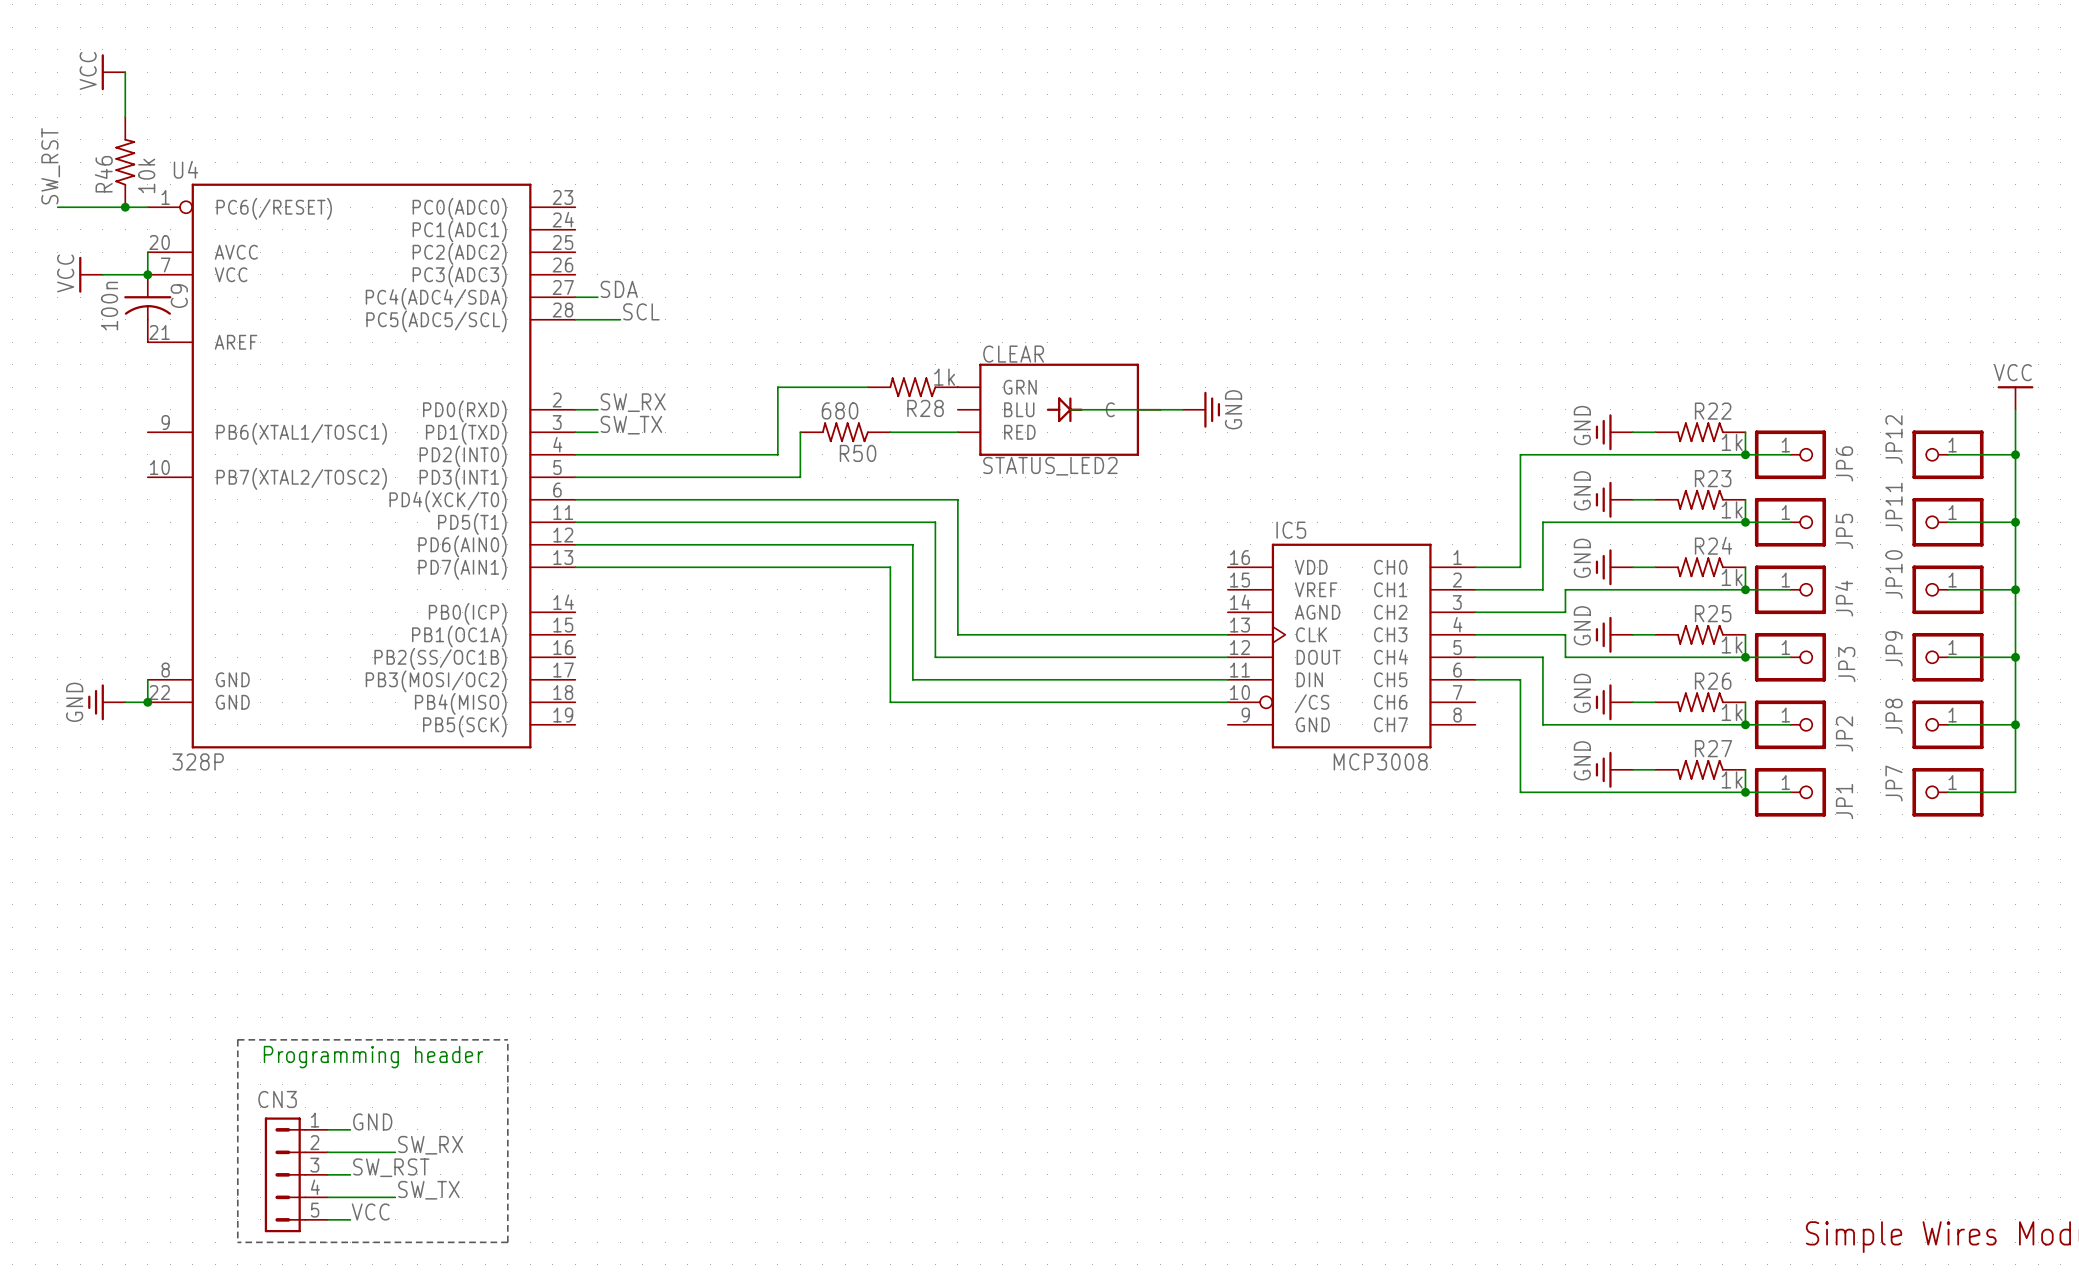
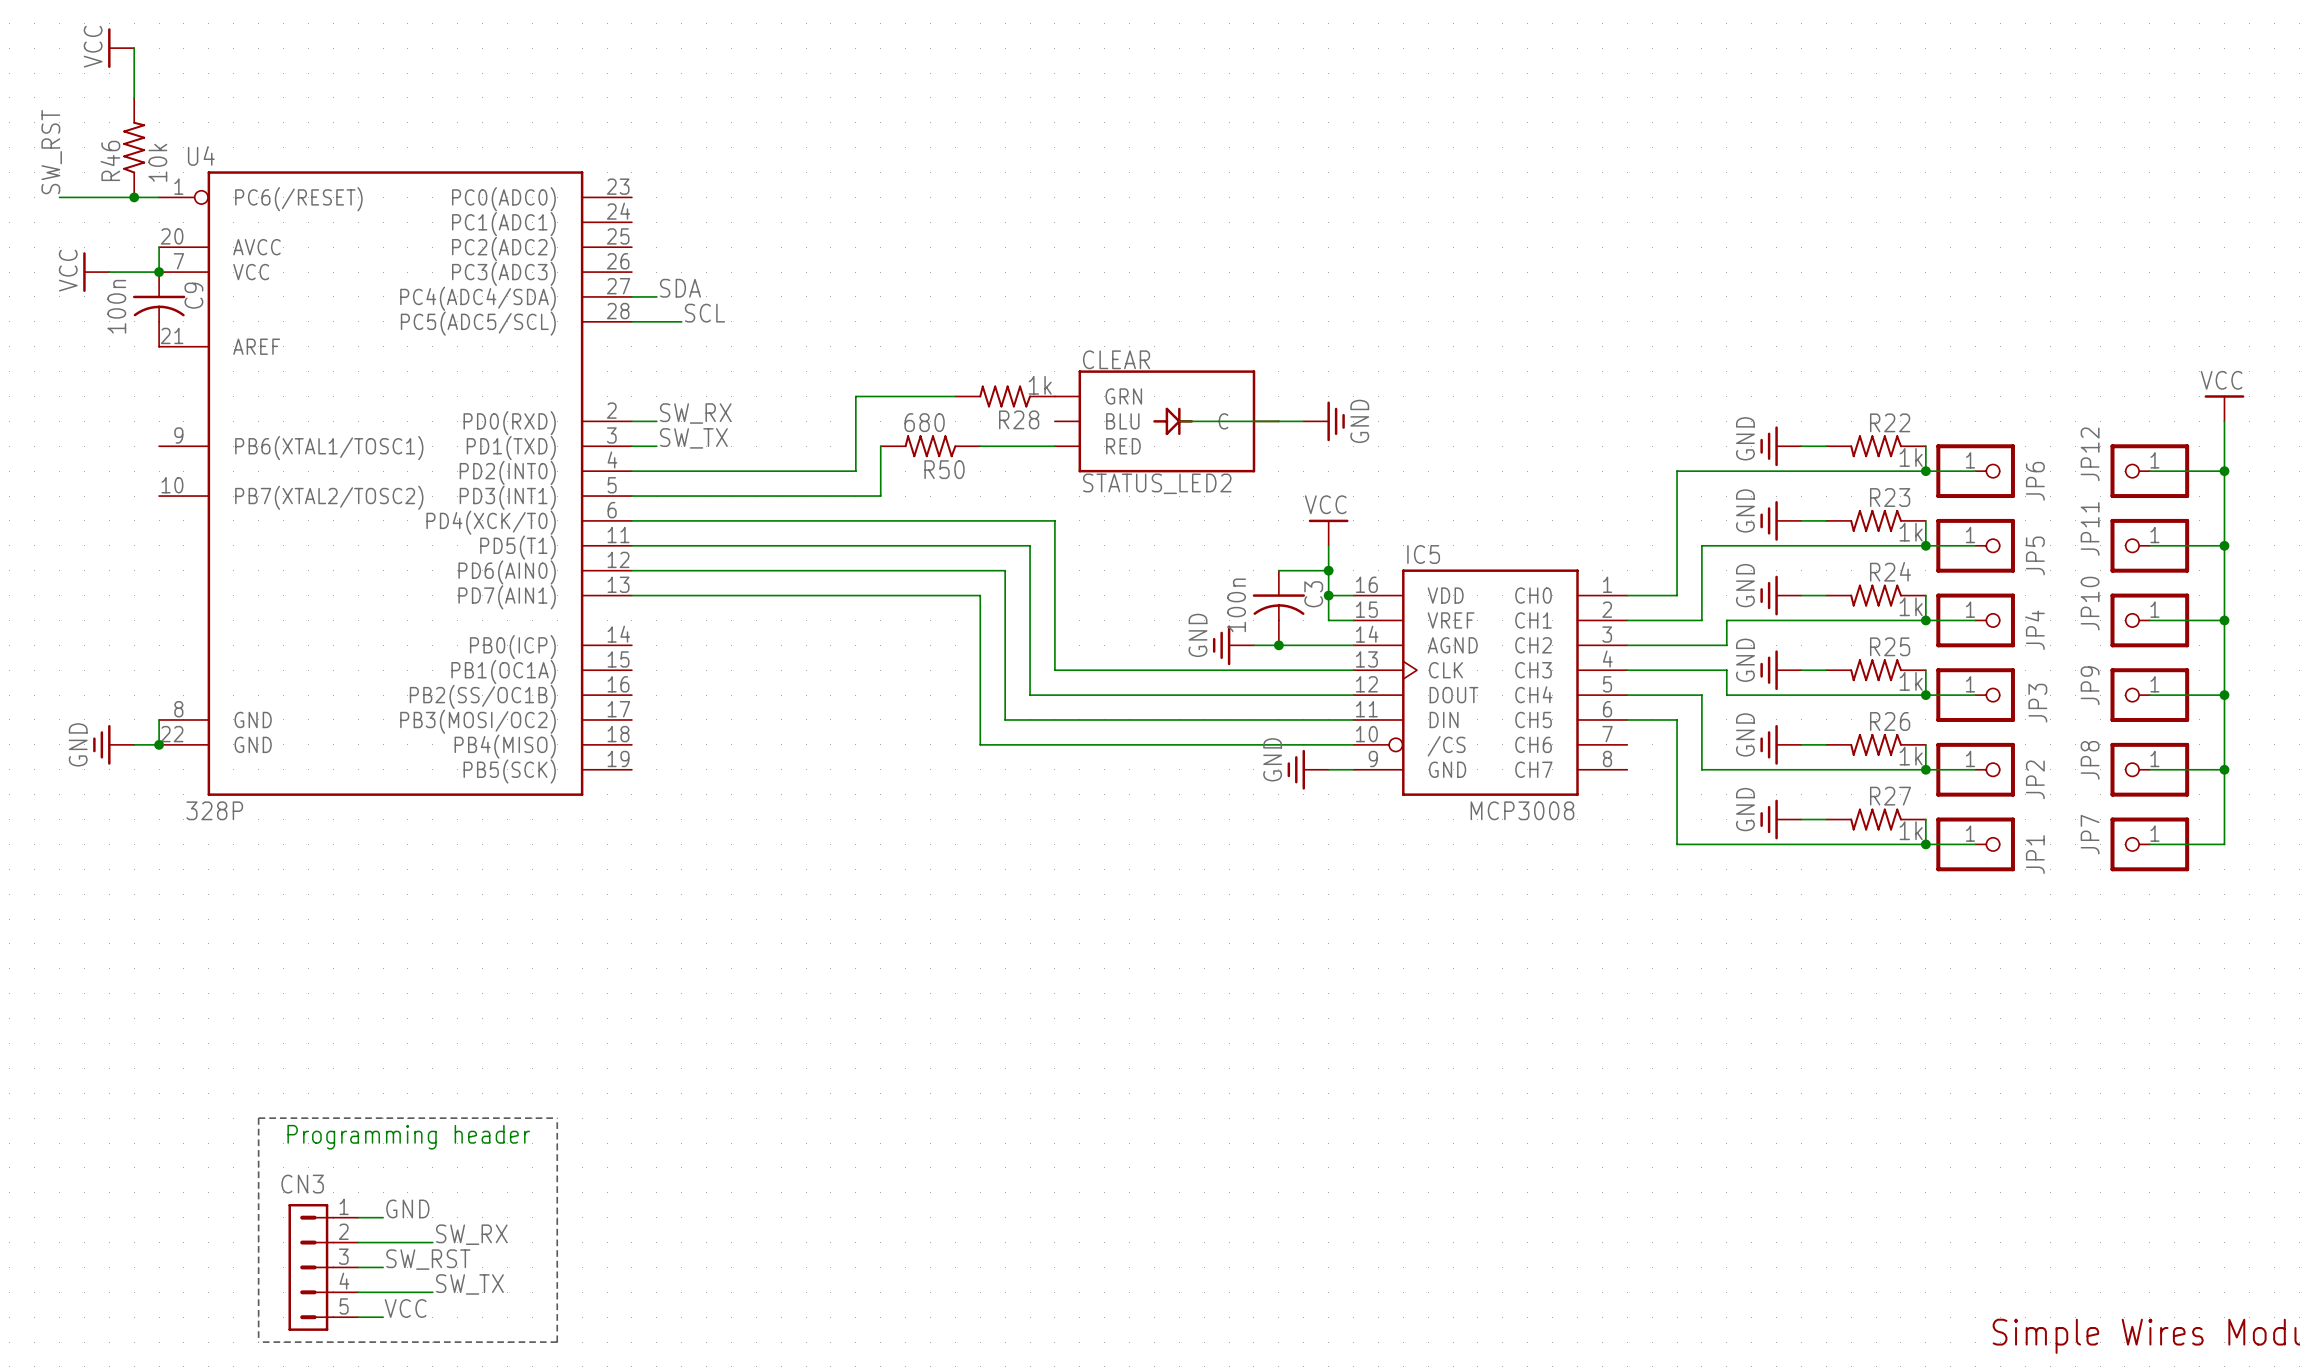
power symbol: none -> VCC (1328, 532)
wire: none -> (1328, 545) (1328, 620) (1353, 620)
wire: none -> (1278, 570) (1328, 570)
junction: none -> (1328, 570)
wire: none -> (1328, 595) (1353, 595)
junction: none -> (1328, 595)
C3: none -> 100n (1278, 608)
power symbol: none -> GND (1233, 645)
wire: none -> (1253, 645) (1353, 645)
junction: none -> (1278, 645)
power symbol: none -> GND (1308, 769)
wire: none -> (1328, 769) (1353, 769)

